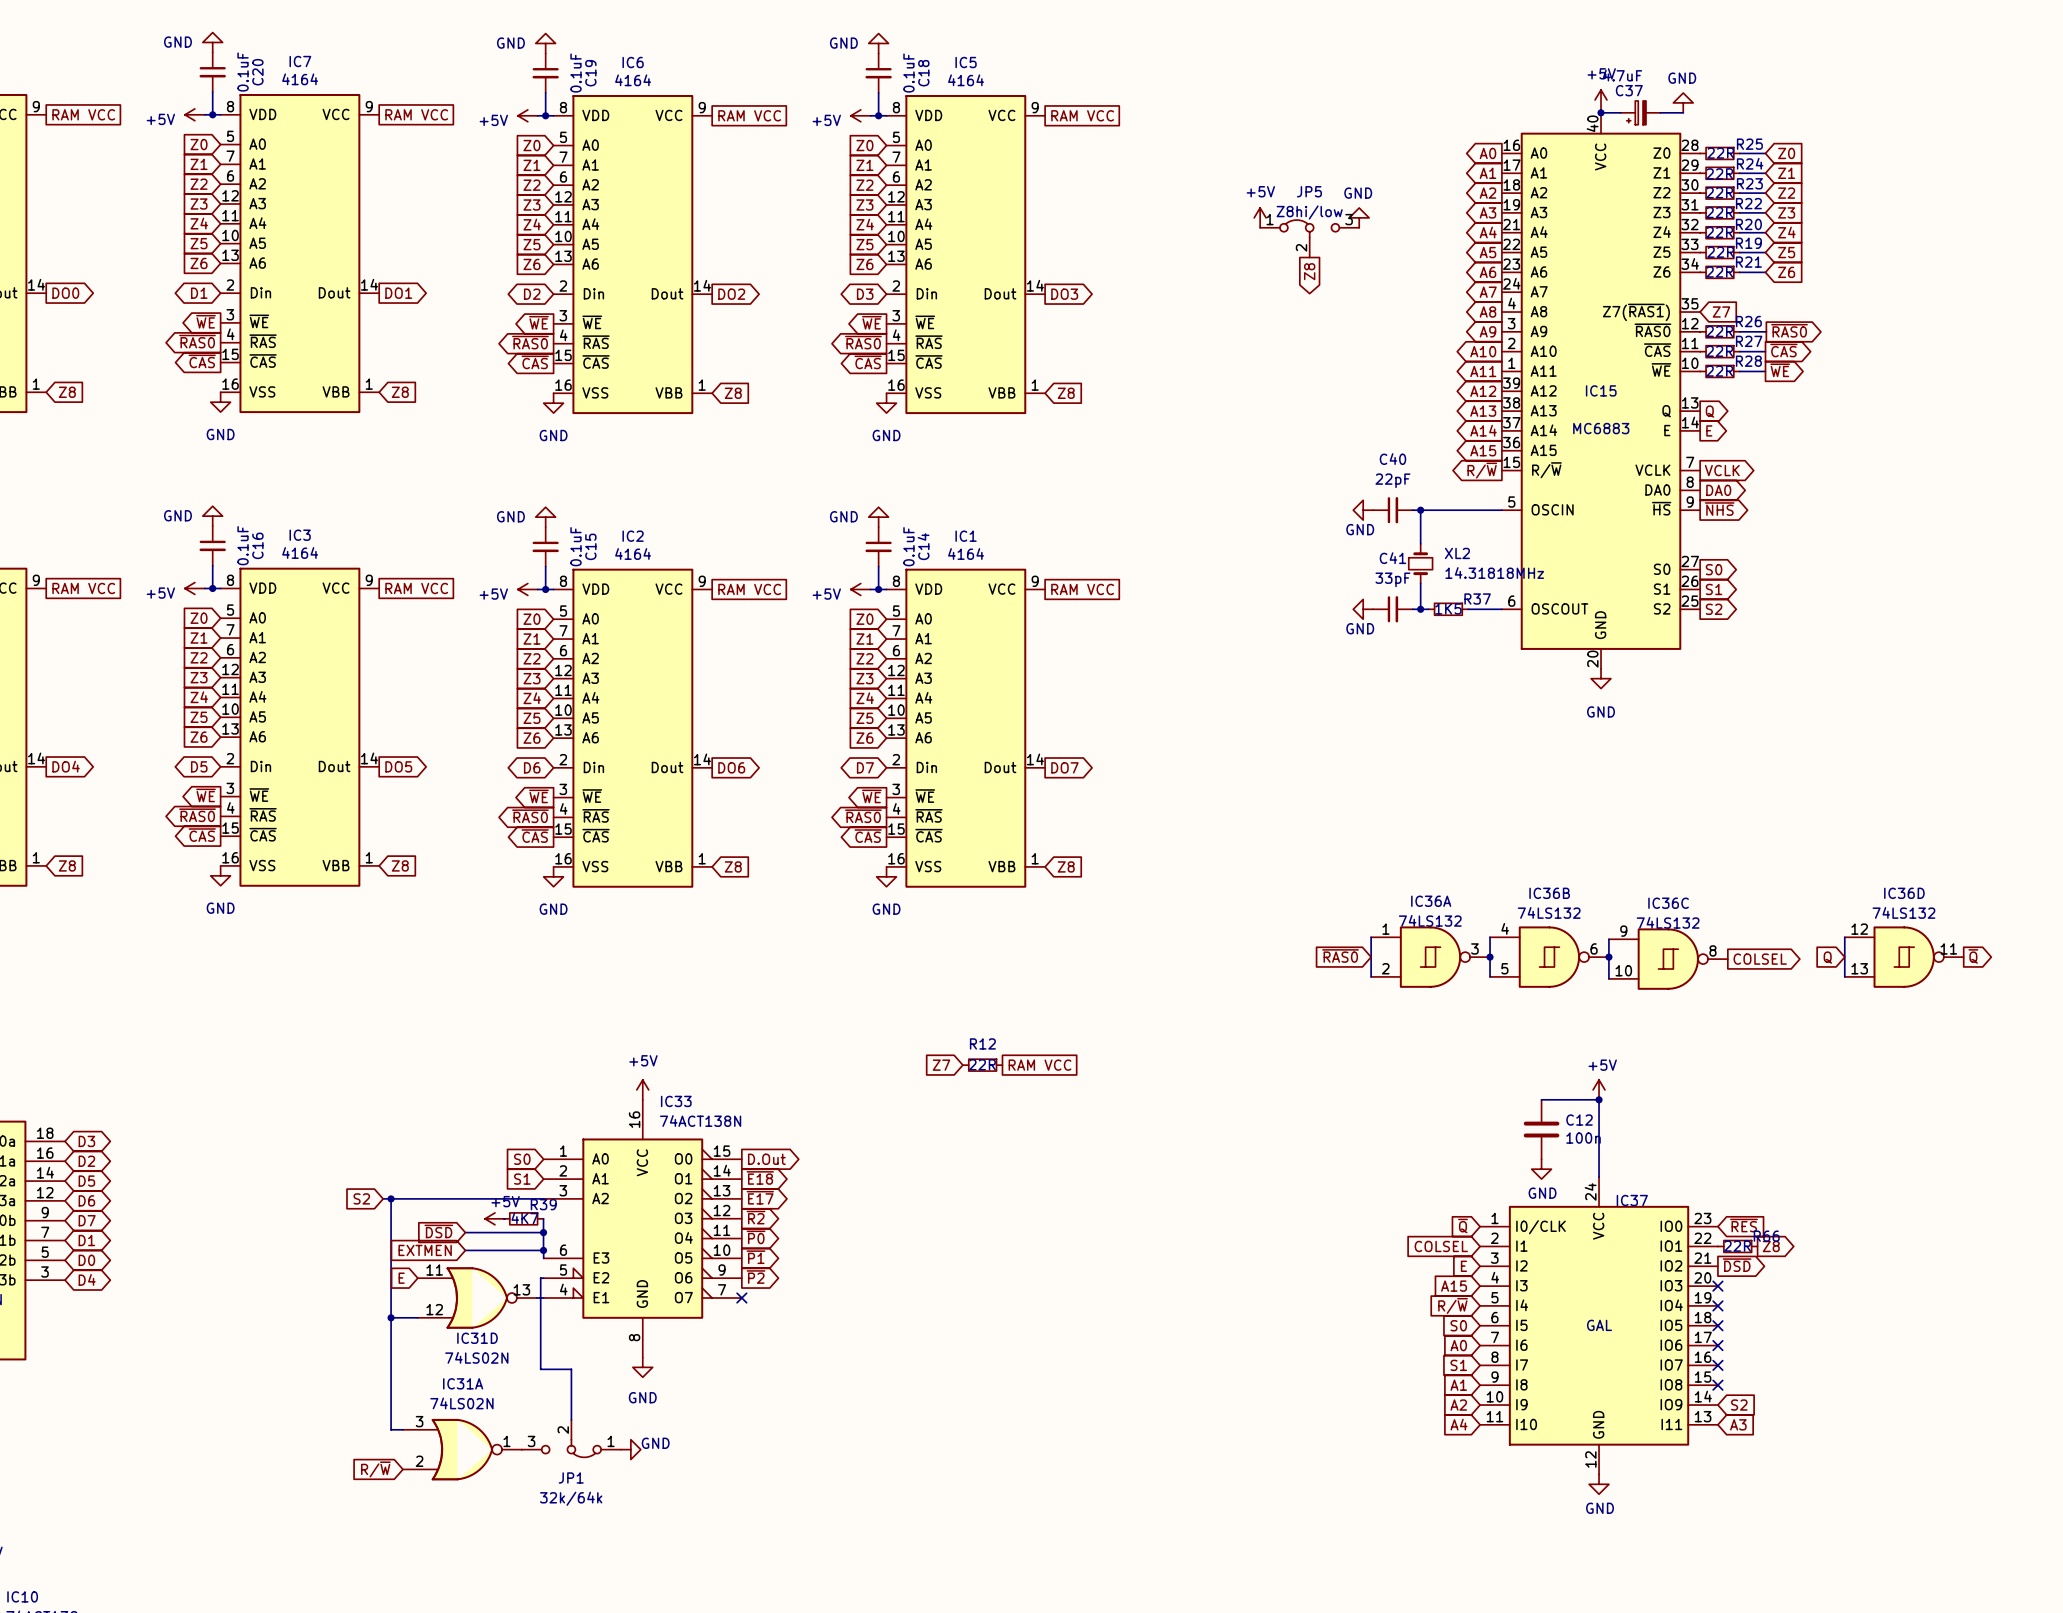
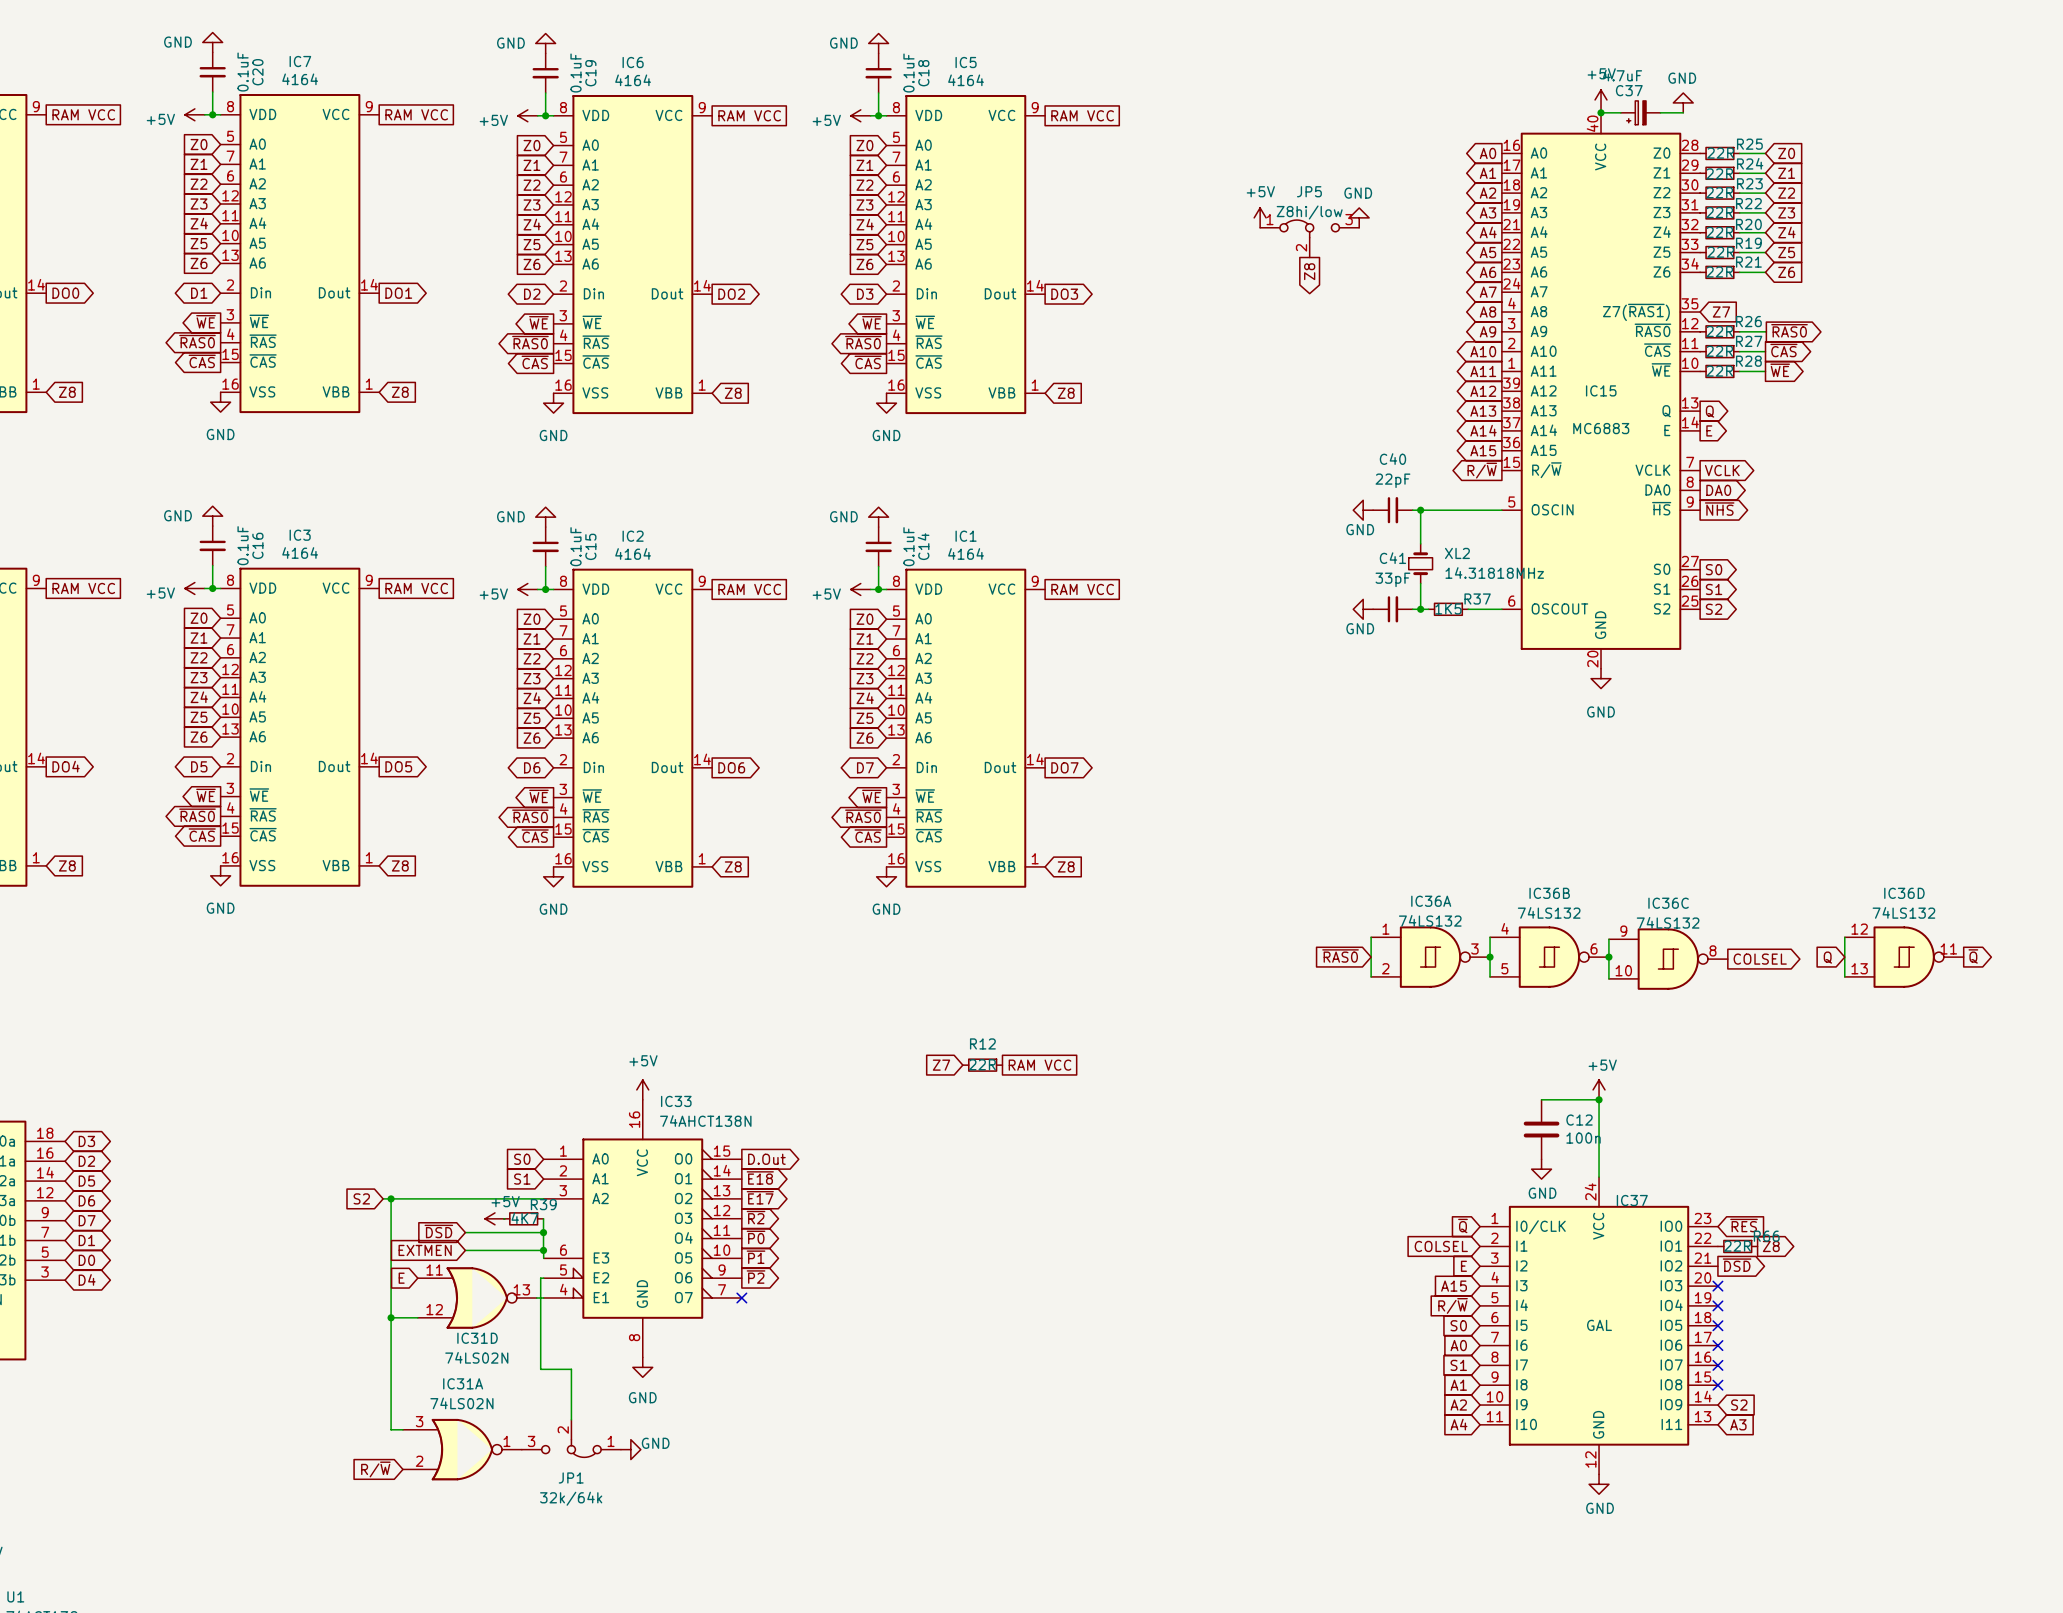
IC33 value: 74ACT138N (700, 1121) -> 74AHCT138N (705, 1121)
IC10 name: IC10 (22, 1596) -> U1 (15, 1596)

